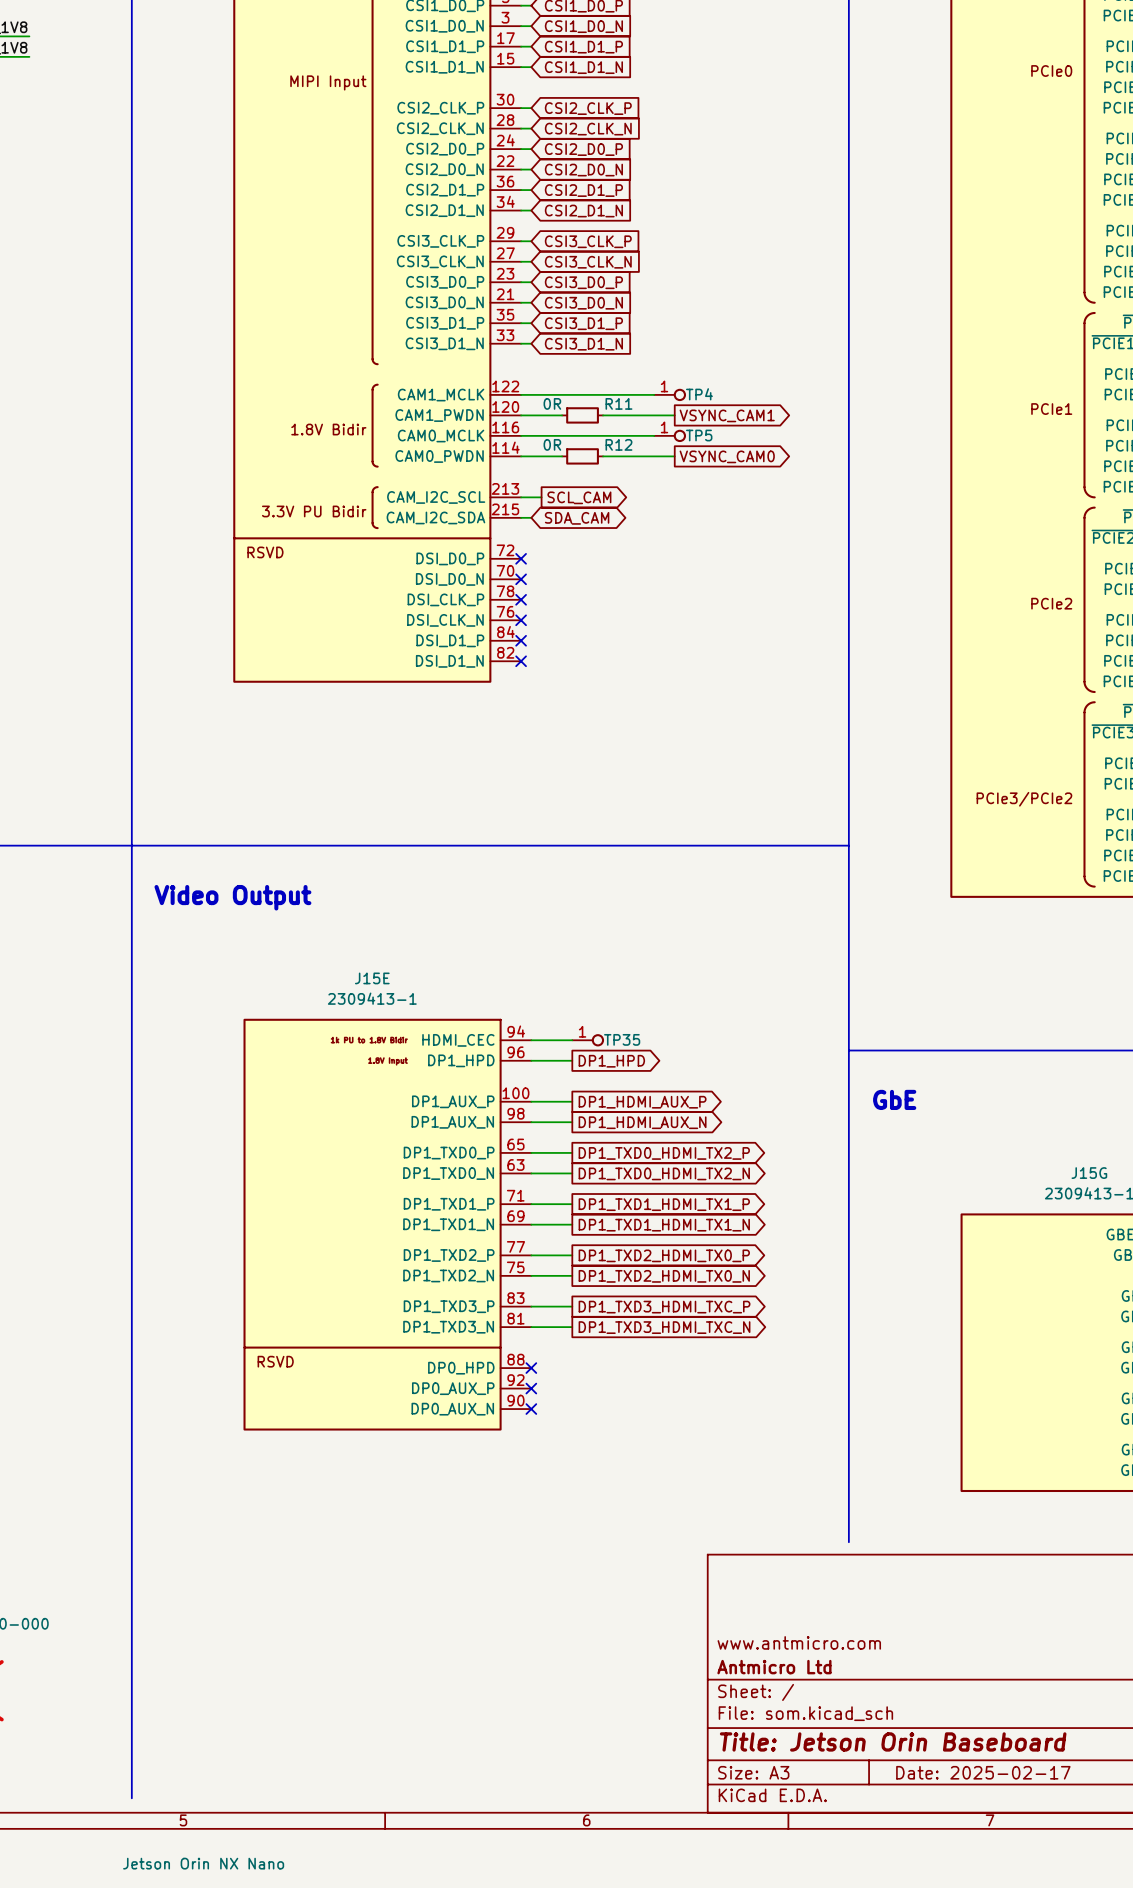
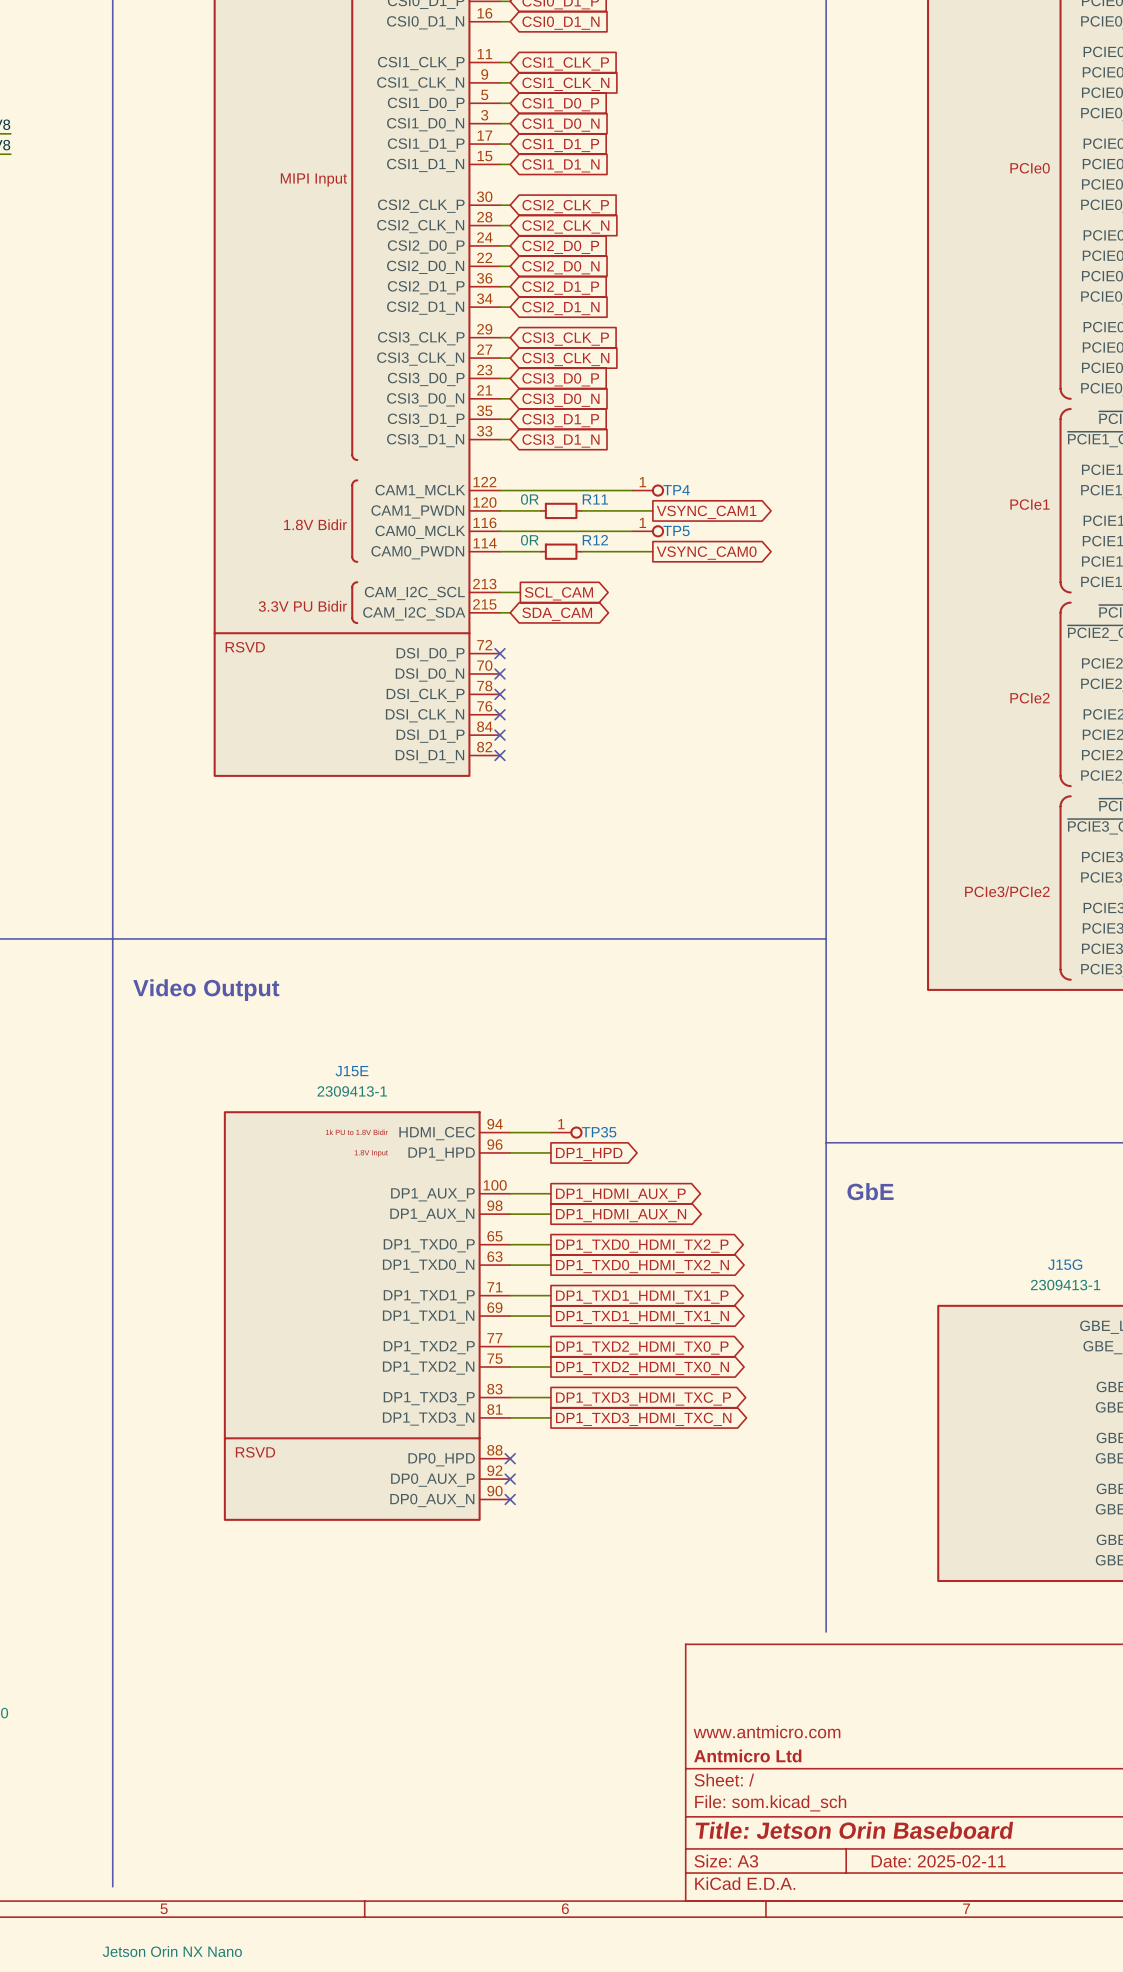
title block: Date: 2025-02-17 (983, 1772) -> Date: 2025-02-11 (938, 1861)

